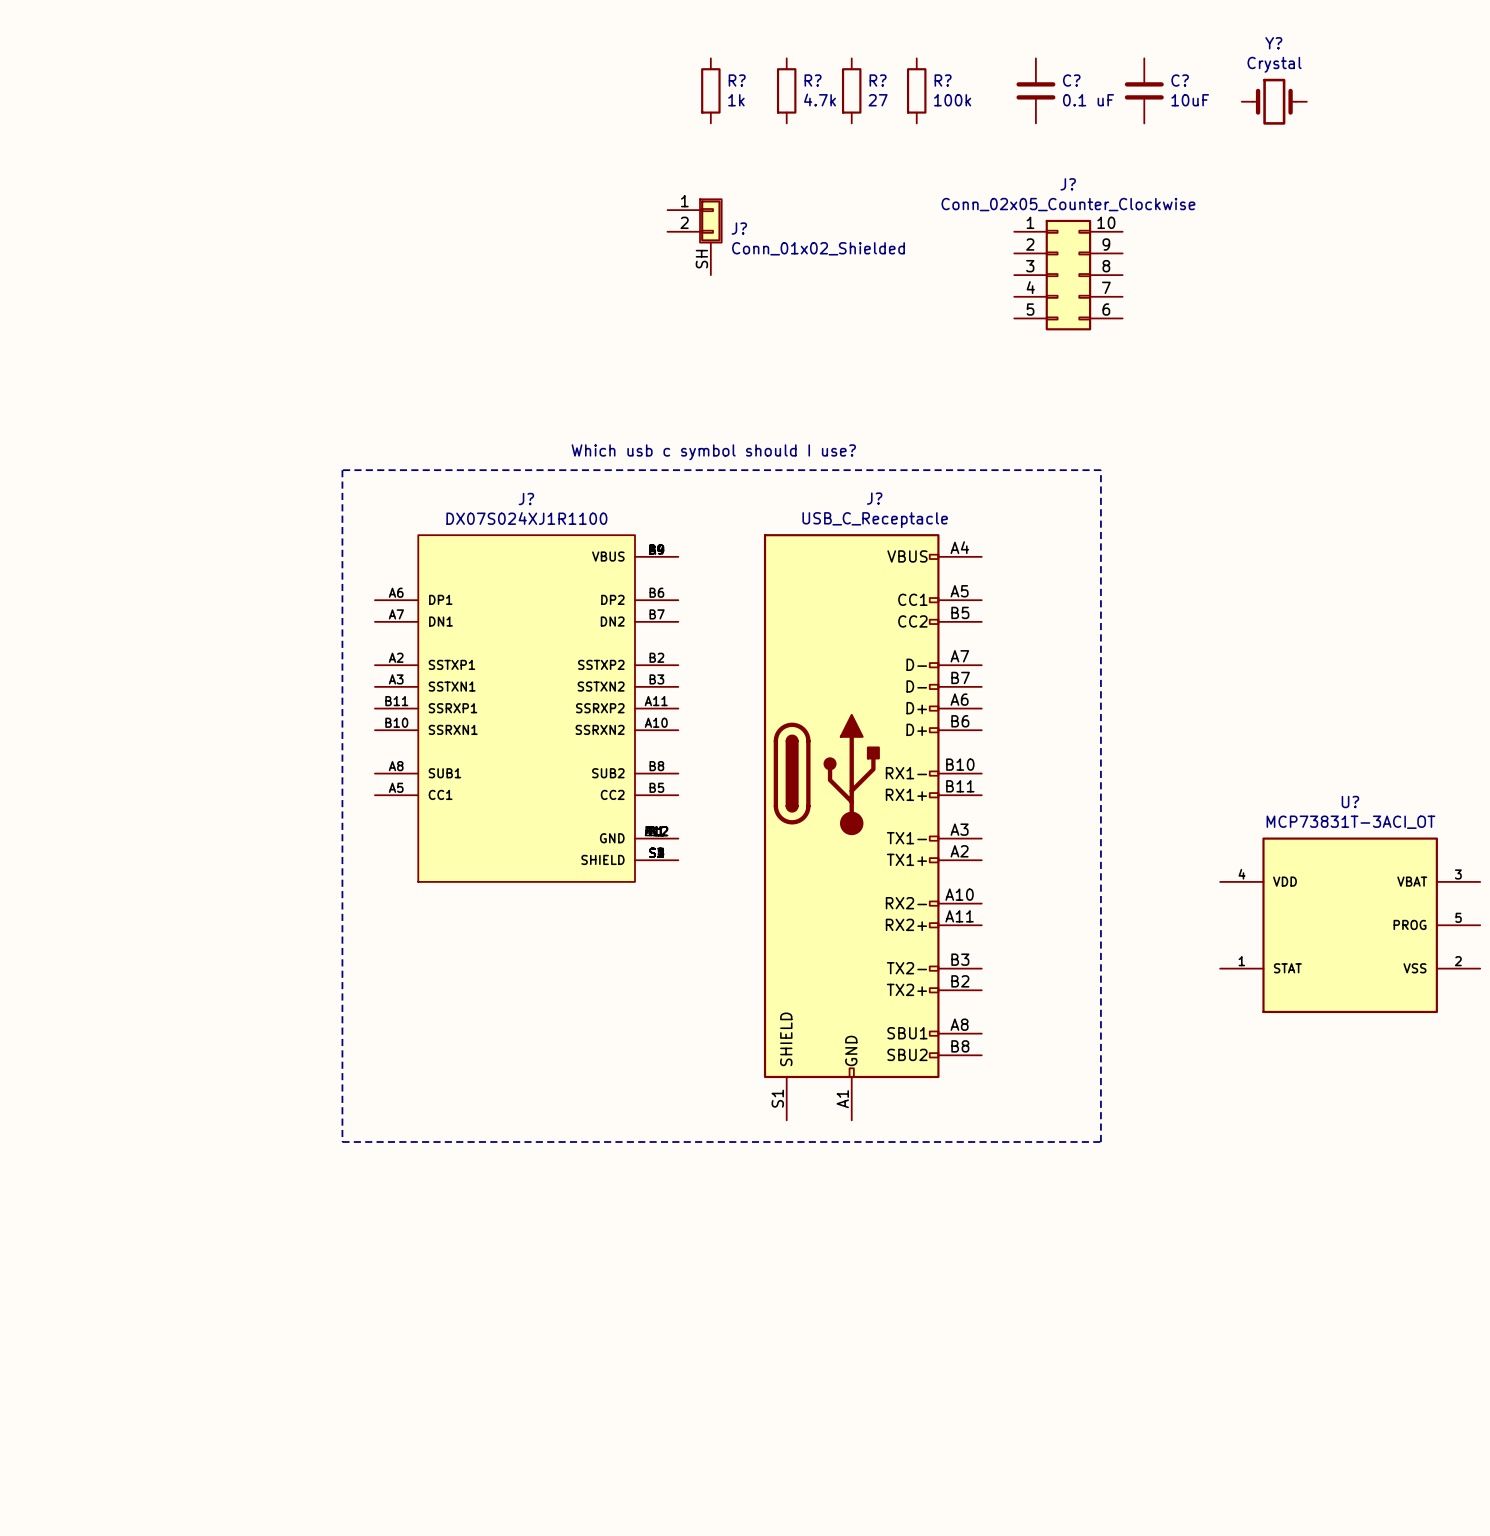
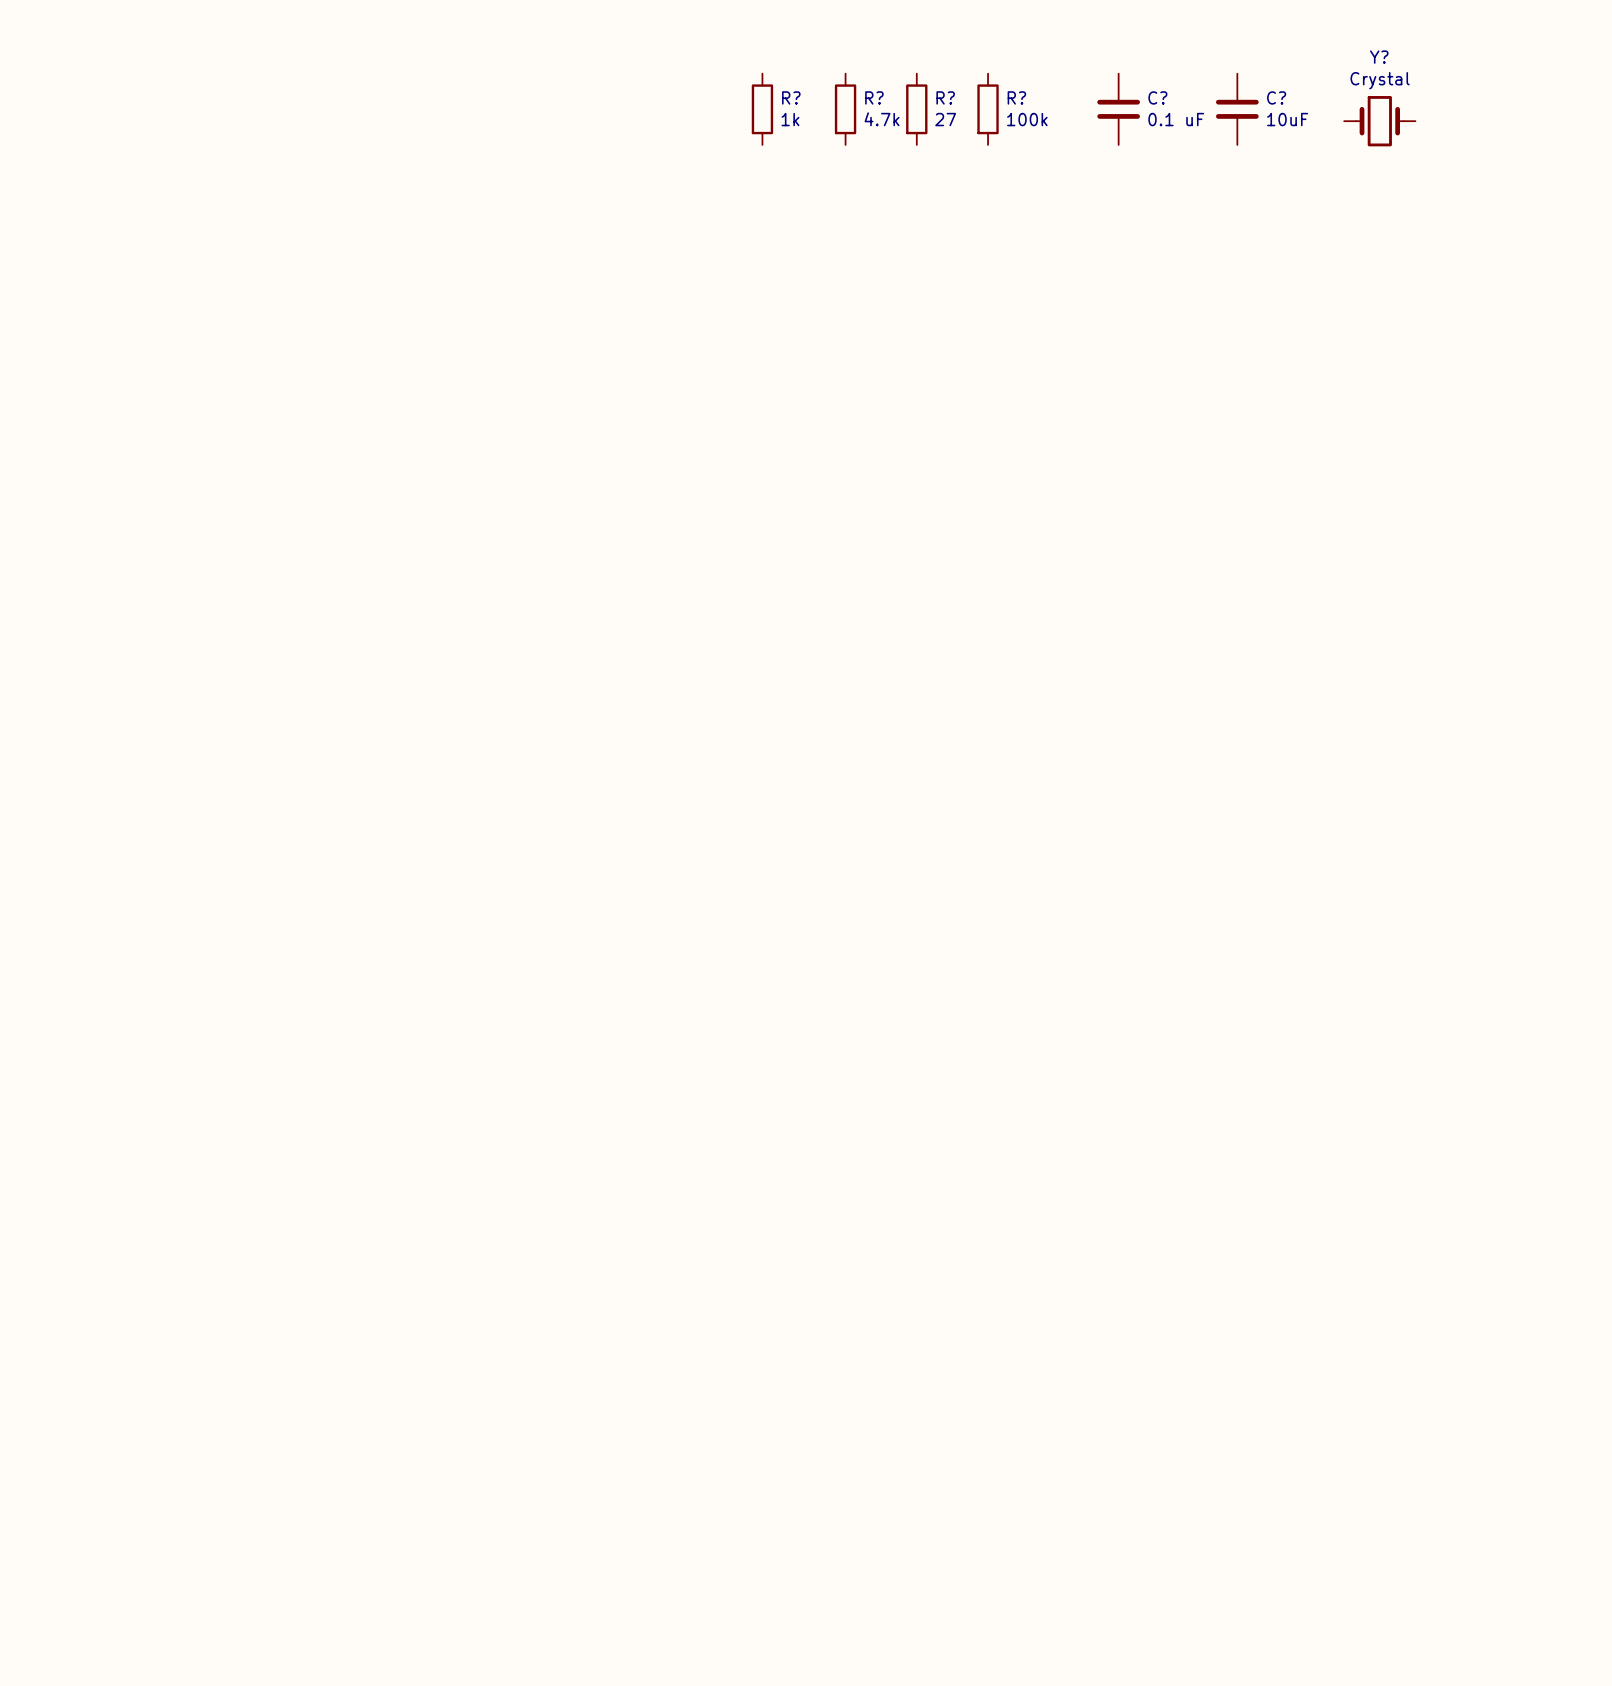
J?: Conn_01x02_Shielded (694, 236) -> none
J?: Conn_02x05_Counter_Clockwise (1068, 275) -> none
text: Which usb c symbol should I use? (713, 452) -> none
line: (342, 470) (342, 1142) (1100, 1142) (1100, 470) (342, 470) -> none
J?: DX07S024XJ1R1100 (526, 708) -> none
J?: USB_C_Receptacle (872, 827) -> none
U?: MCP73831T-3ACI_OT (1350, 925) -> none

